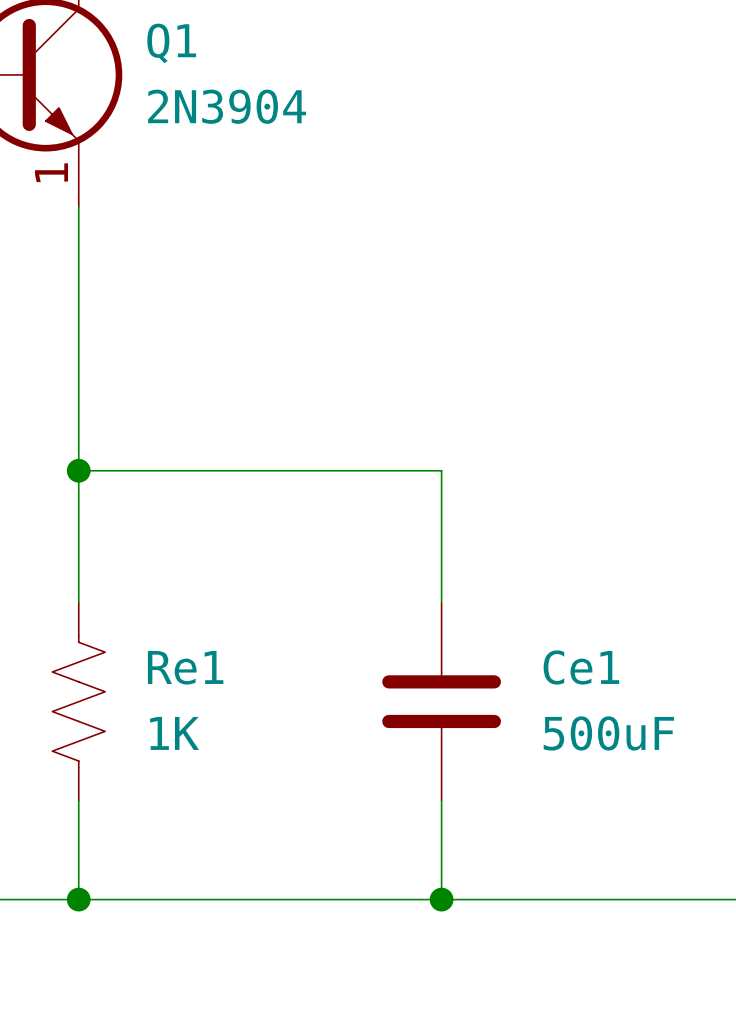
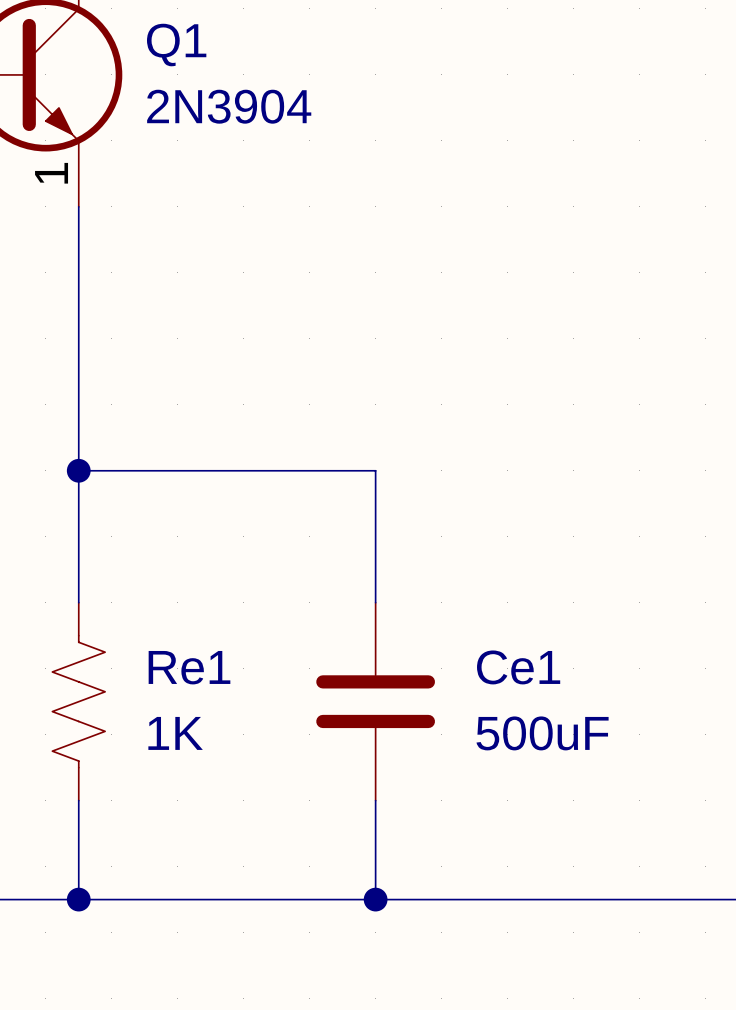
wire: (375, 470) (441, 470) (441, 602) -> (375, 470) (375, 602)
Ce1 position: (441, 701) -> (375, 701)
wire: (441, 800) (441, 899) -> (375, 800) (375, 899)
junction position: (441, 899) -> (375, 899)

